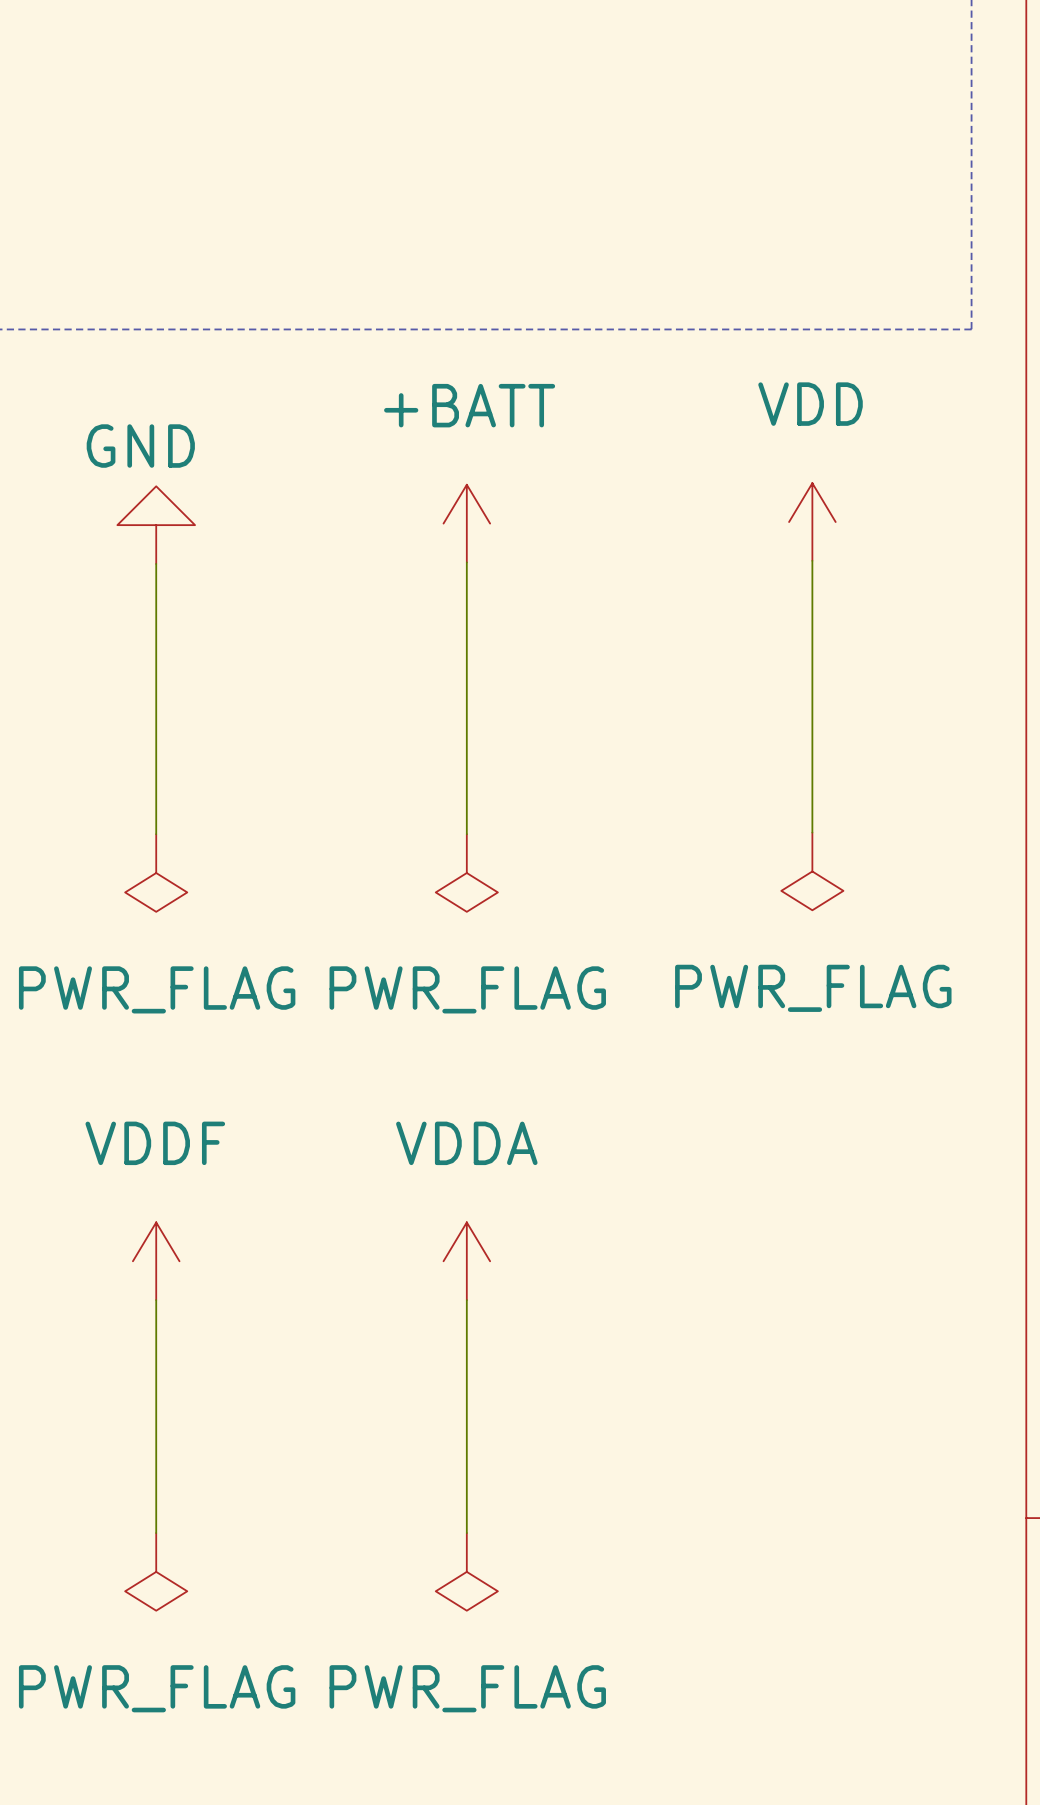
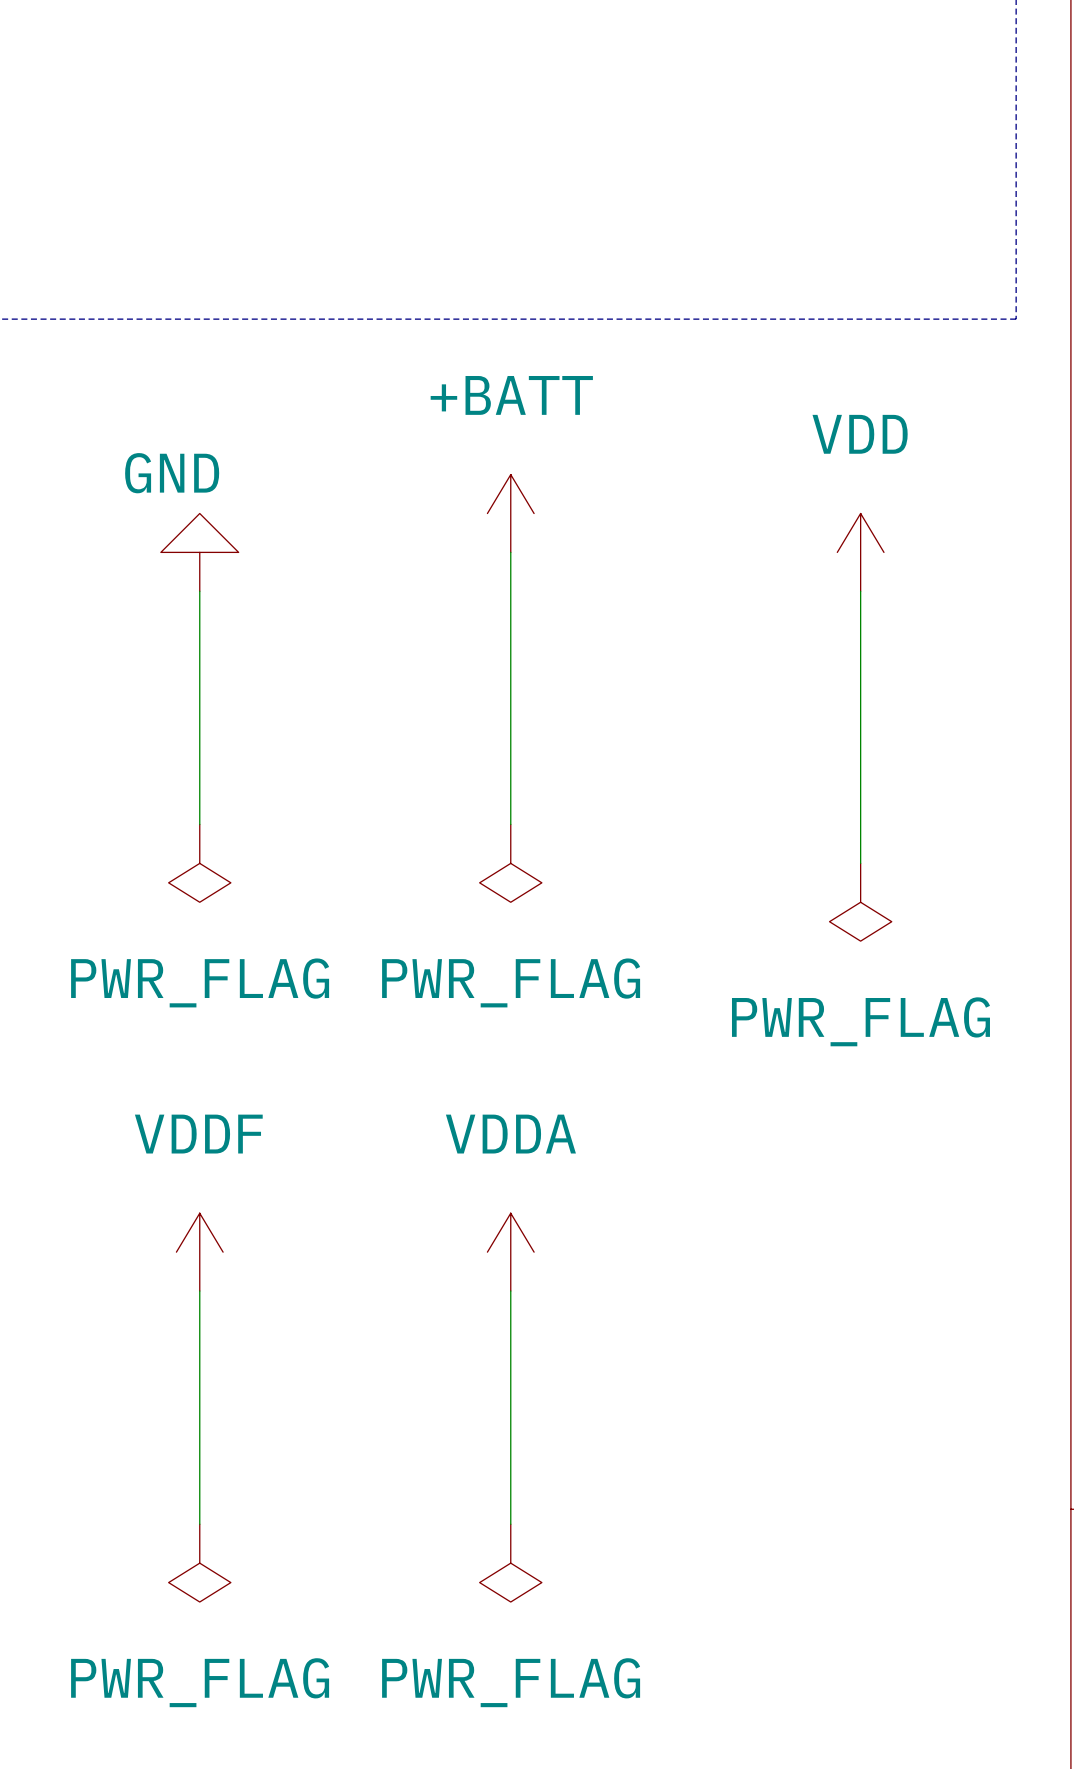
power symbol position: VDD (812, 522) -> VDD (860, 552)
power symbol position: GND (156, 525) -> GND (199, 552)
wire: (812, 560) (812, 832) -> (860, 591) (860, 863)
power symbol position: PWR_FLAG (812, 871) -> PWR_FLAG (860, 902)

